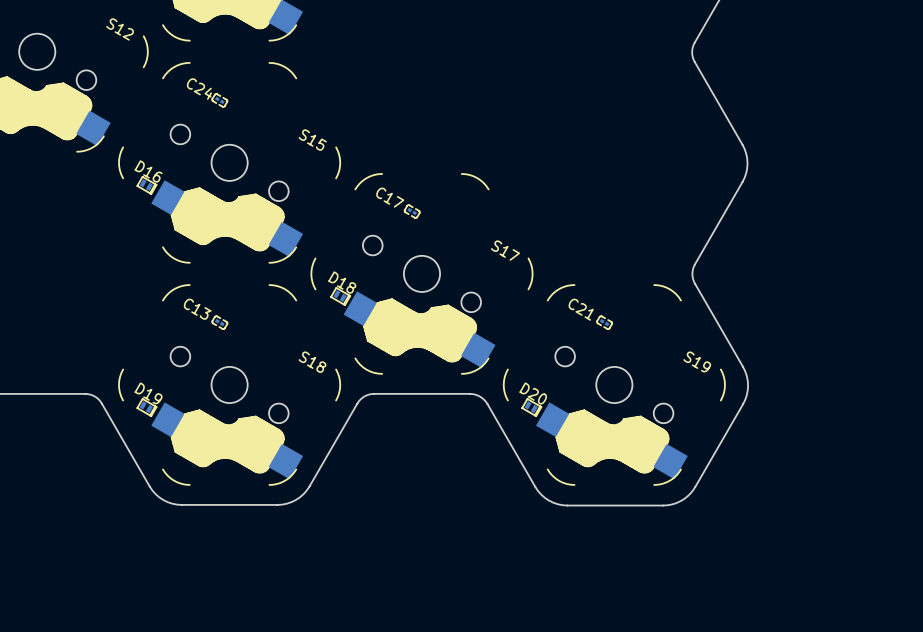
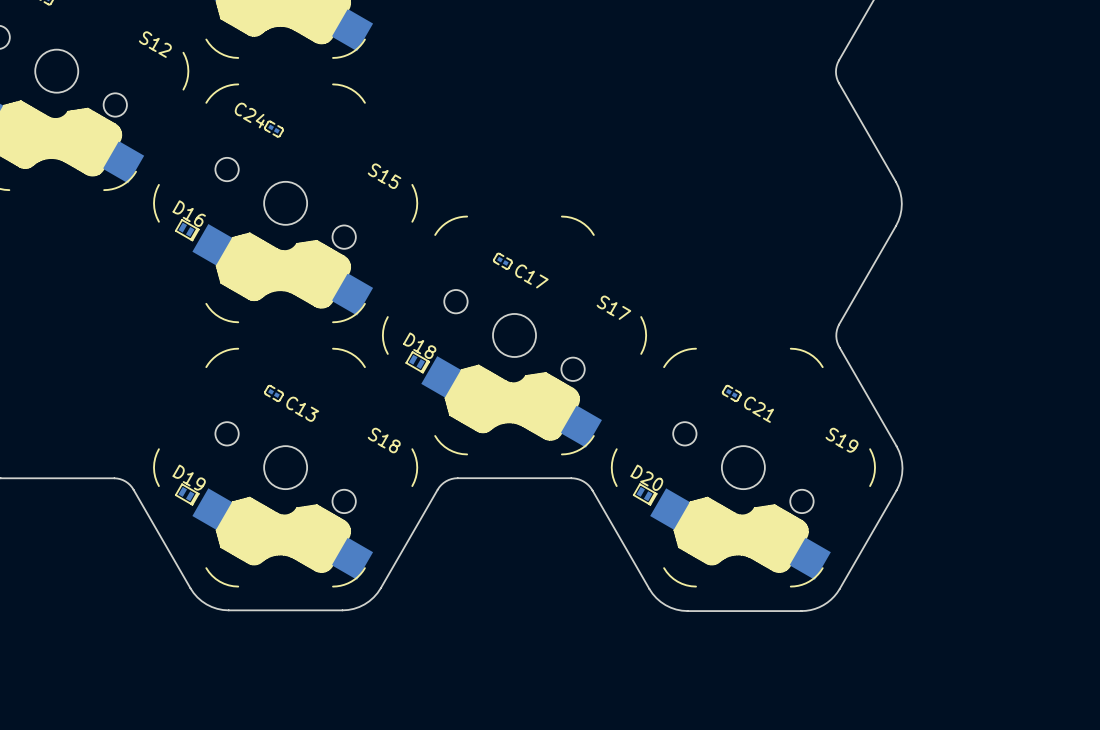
C17 name position: C17 (390, 197) -> C17 (531, 276)
C13 name position: C13 (197, 309) -> C13 (302, 409)
C21 name position: C21 (581, 309) -> C21 (759, 409)

